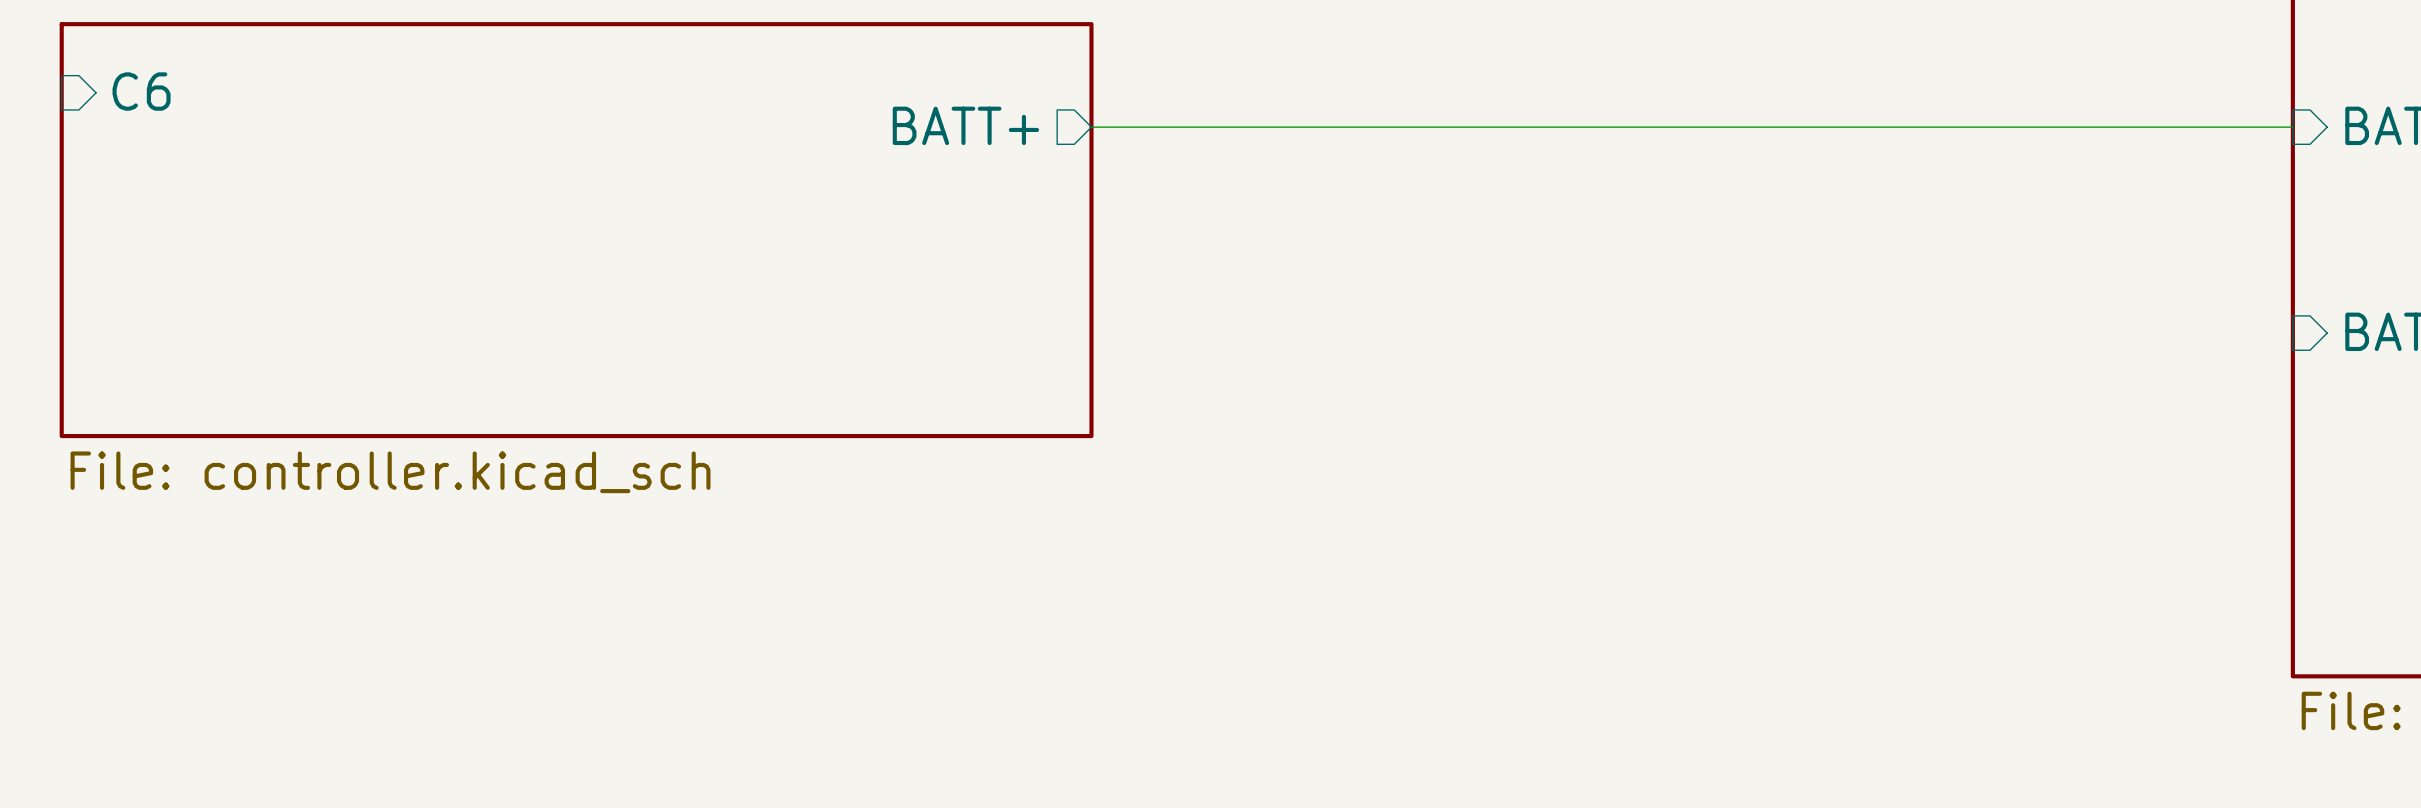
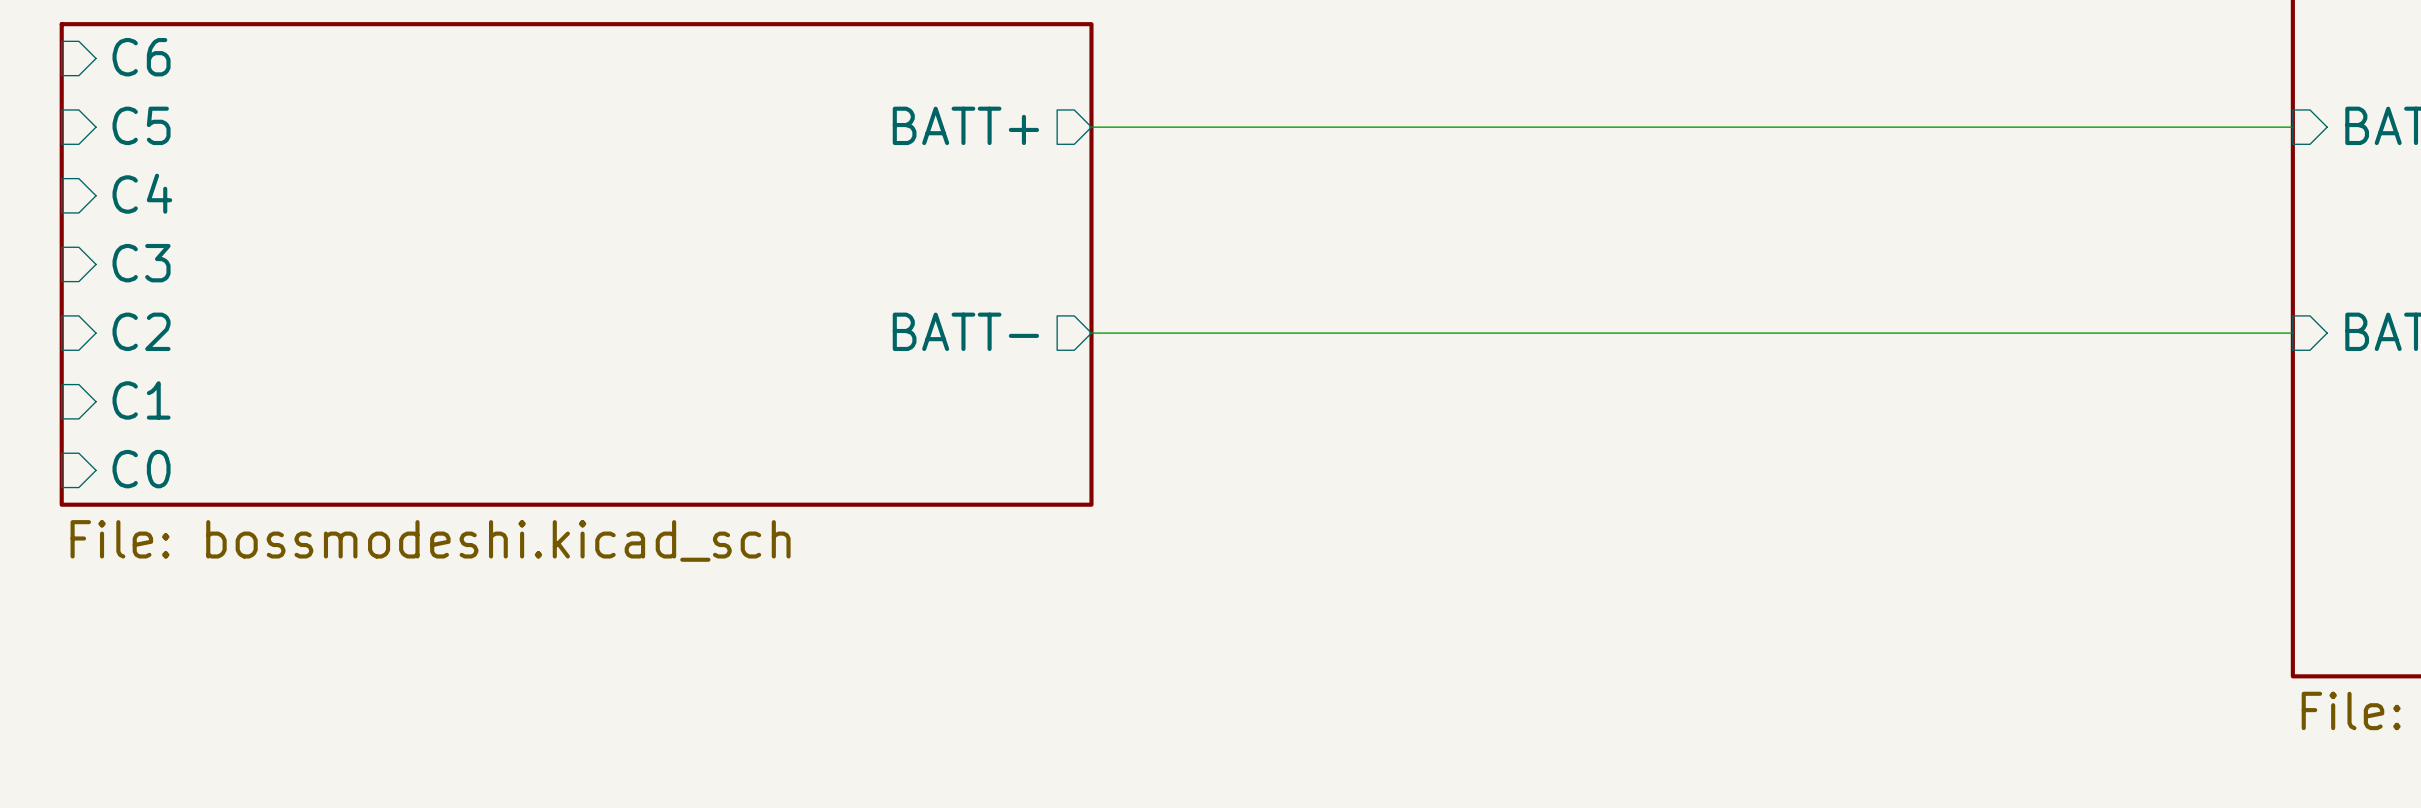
sheet pin position: C6 (141, 91) -> C6 (141, 57)
sheet pin: none -> C5 (141, 125)
sheet pin: none -> C4 (142, 193)
sheet: File: controller.kicad_sch (576, 230) -> none
sheet pin: none -> C3 (141, 263)
sheet: none -> File: bossmodeshi.kicad_sch (576, 264)
sheet pin: none -> C2 (141, 331)
sheet pin: none -> BATT- (965, 331)
wire: none -> (1091, 333) (2292, 333)
sheet pin: none -> C1 (141, 400)
sheet pin: none -> C0 (141, 469)

